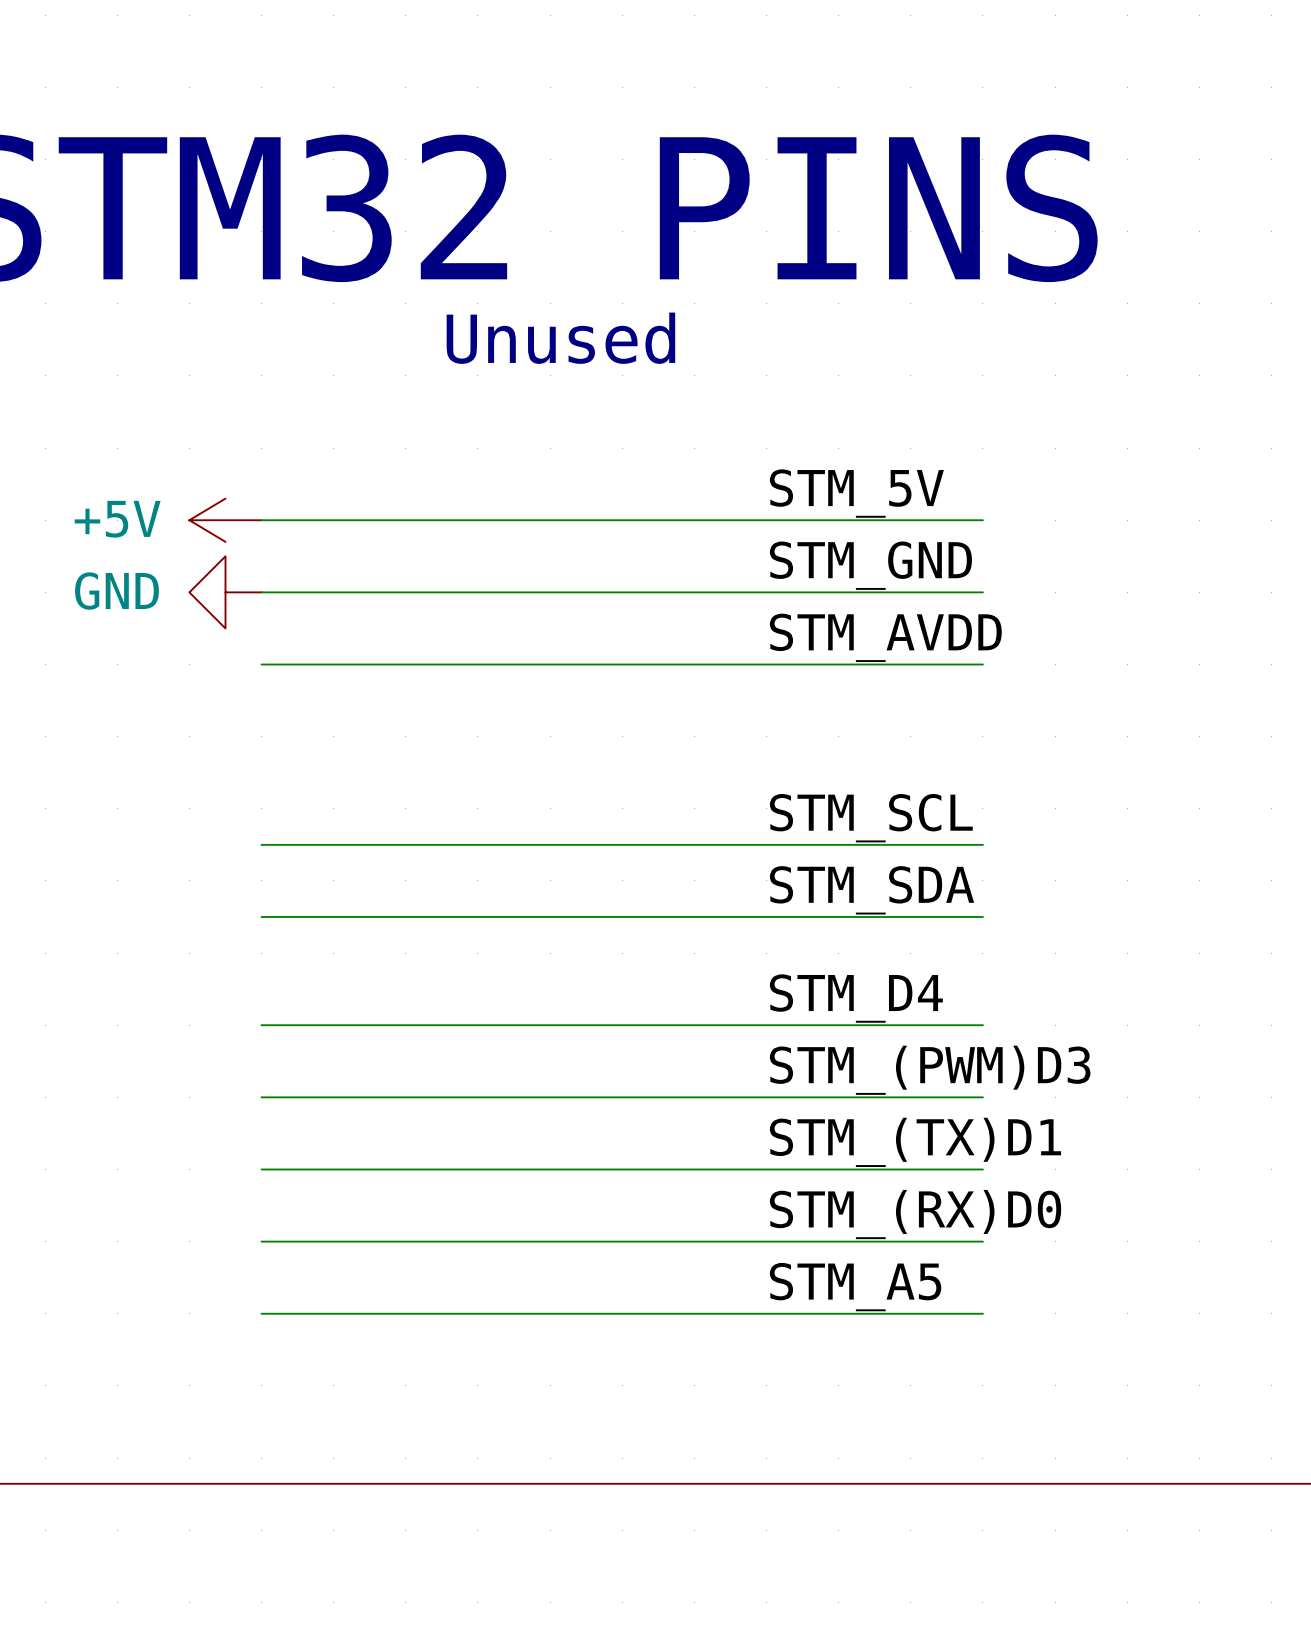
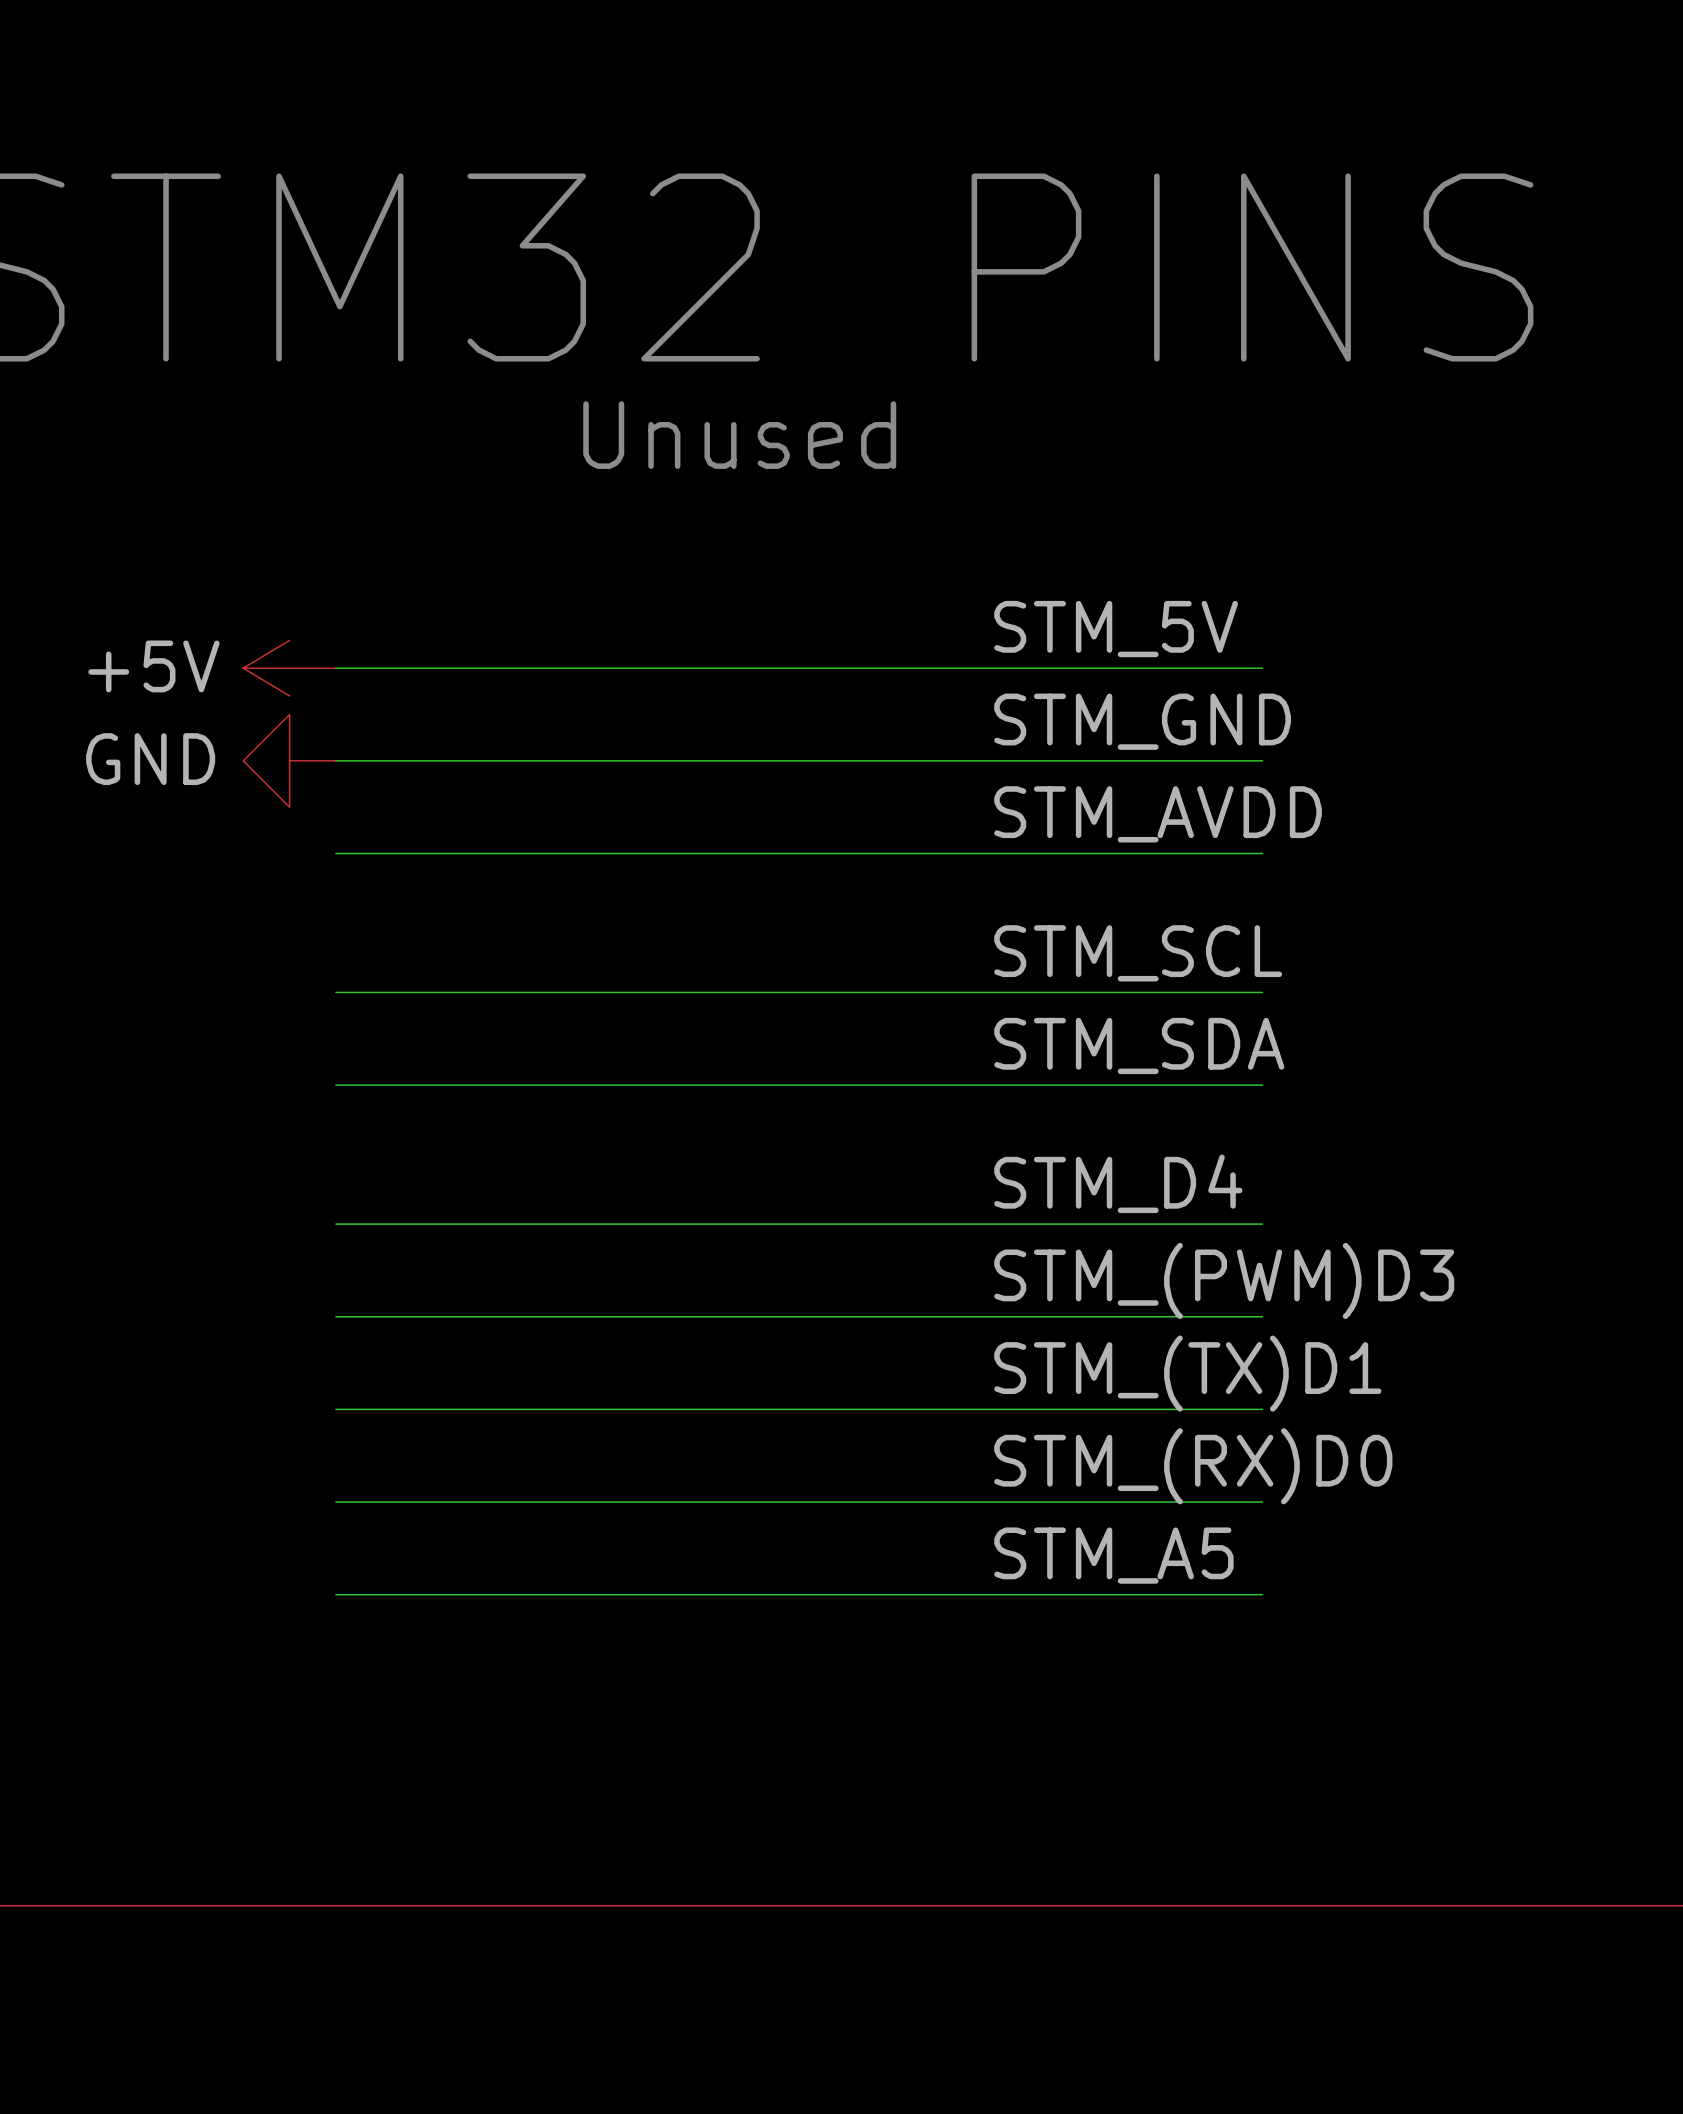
label: none -> STM_SCL (1138, 953)
label: STM_SCL (871, 818) -> STM_SDA (1139, 1045)
label: STM_SDA (872, 890) -> STM_D4 (1118, 1183)
wire: (261, 917) (982, 917) -> (335, 1224) (1262, 1224)
label: STM_D4 (856, 998) -> STM_(PWM)D3 (1224, 1280)
label: STM_(PWM)D3 (930, 1070) -> STM_(TX)D1 (1187, 1373)
label: STM_(TX)D1 (915, 1142) -> STM_(RX)D0 (1193, 1466)
label: STM_(RX)D0 (915, 1214) -> STM_A5 (1113, 1555)
label: STM_A5 (855, 1287) -> none
wire: (261, 1313) (982, 1313) -> (335, 992) (1262, 992)

